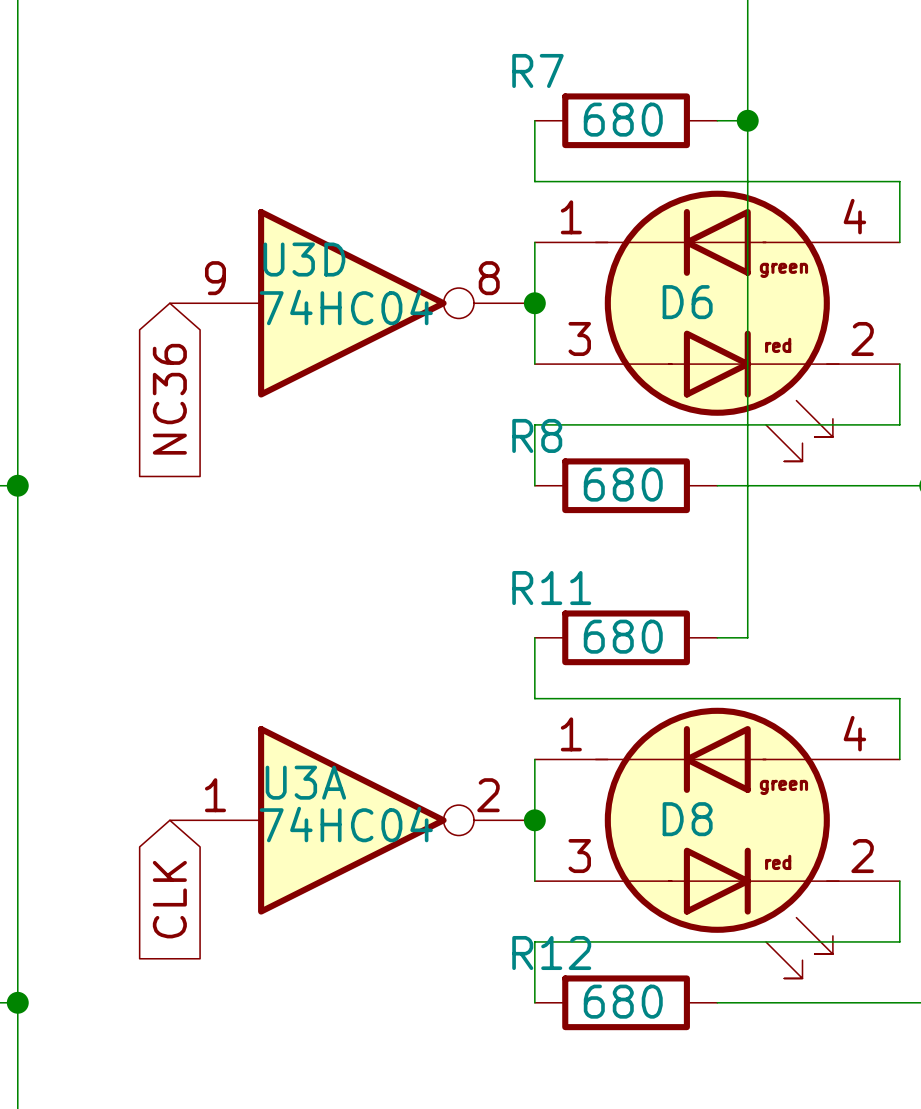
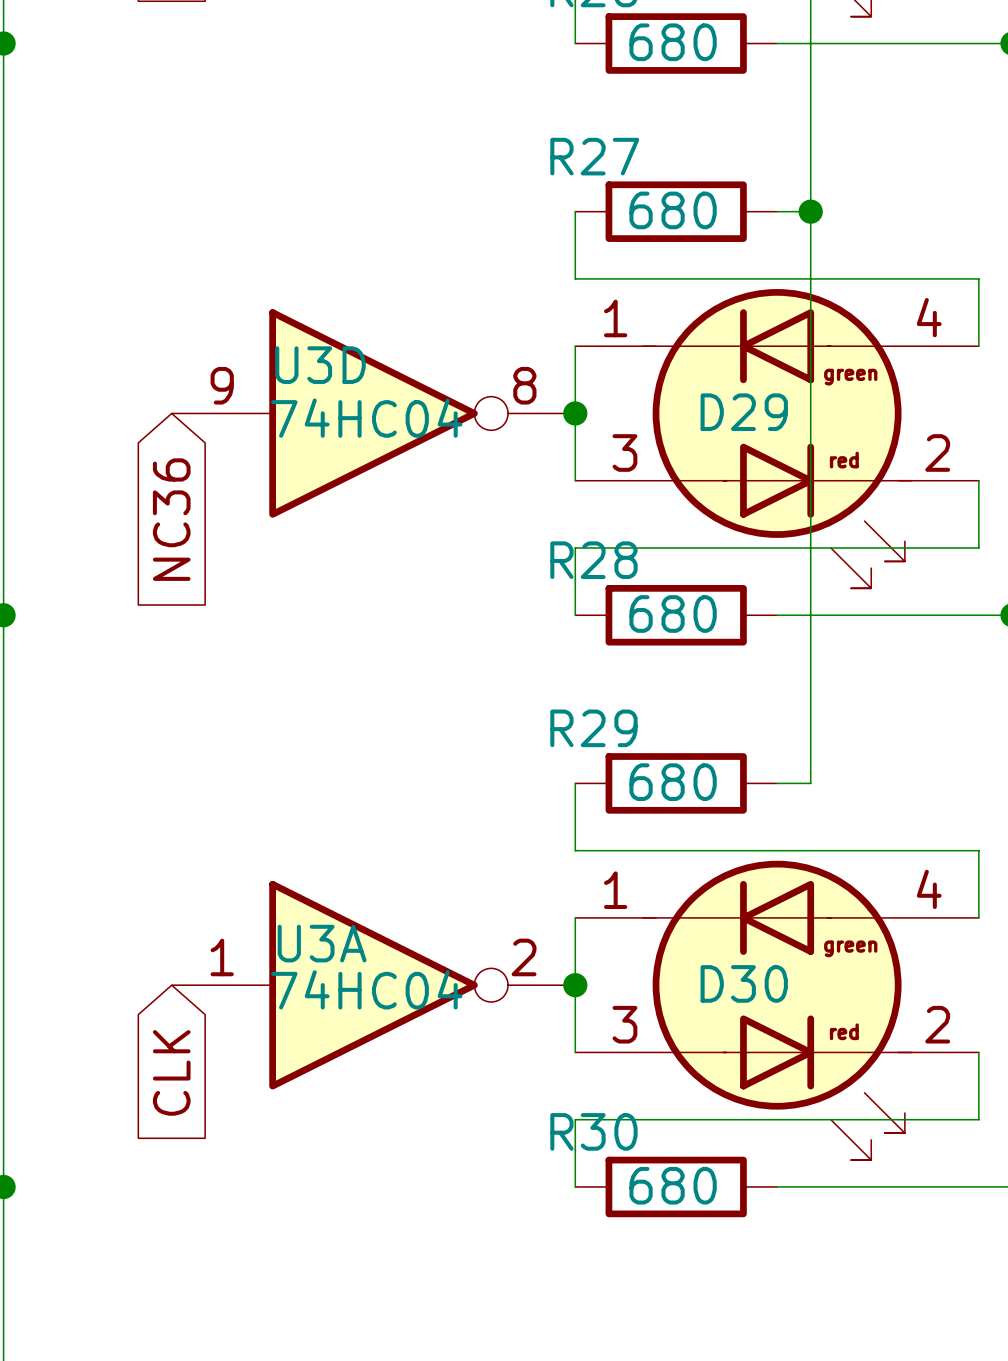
R7 name: R7 (537, 70) -> R27 (594, 156)
D6 name: D6 (687, 302) -> D29 (744, 412)
R8 name: R8 (537, 435) -> R28 (593, 560)
R11 name: R11 (551, 588) -> R29 (593, 728)
D8 name: D8 (687, 819) -> D30 (744, 983)
R12 name: R12 (551, 952) -> R30 (593, 1131)

